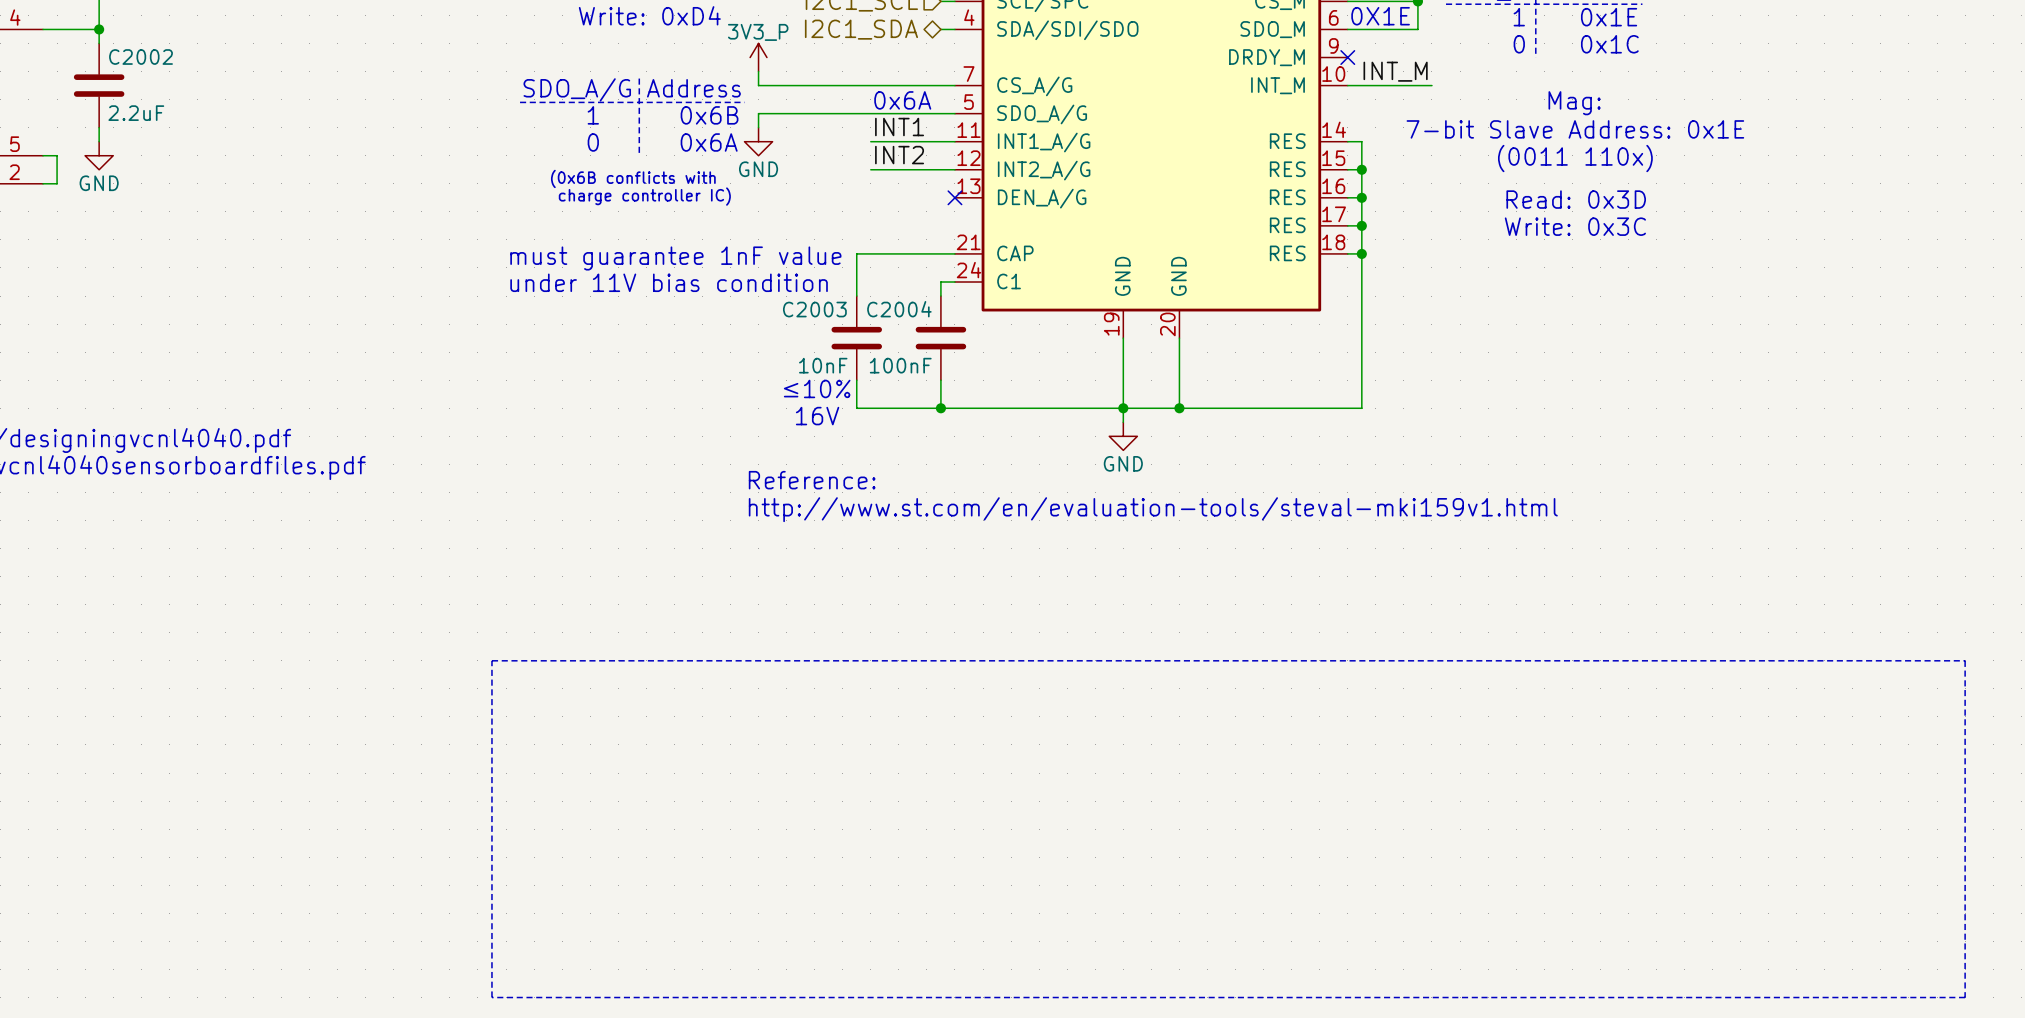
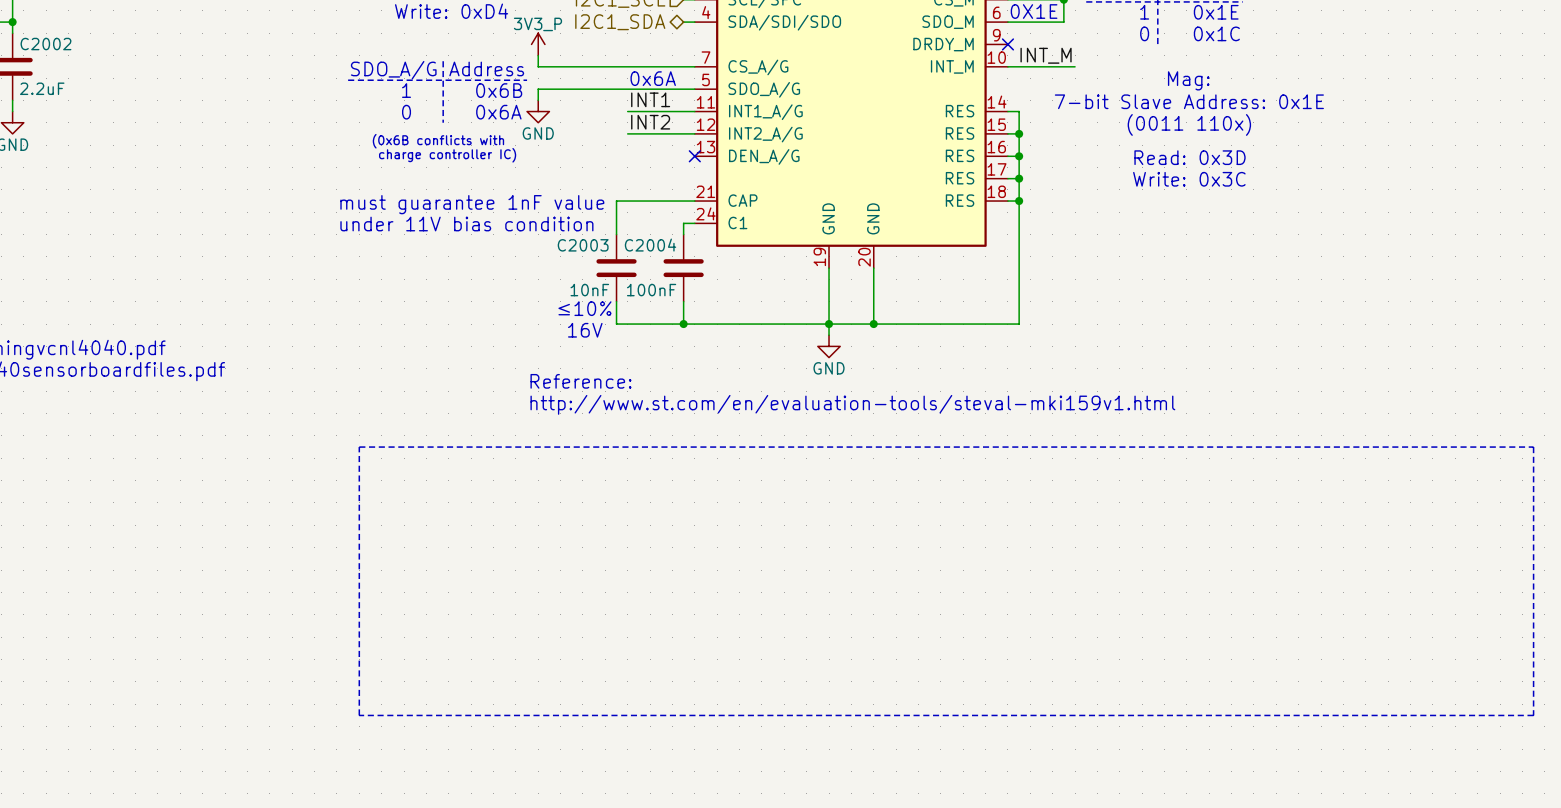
line: (491, 660) (1965, 660) (1965, 997) (491, 997) (491, 660) -> (359, 447) (359, 715) (1533, 715) (1533, 447) (359, 447)

